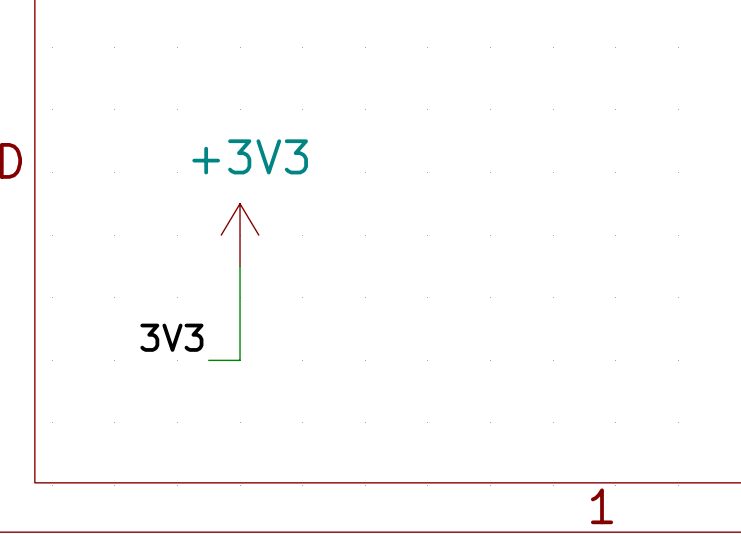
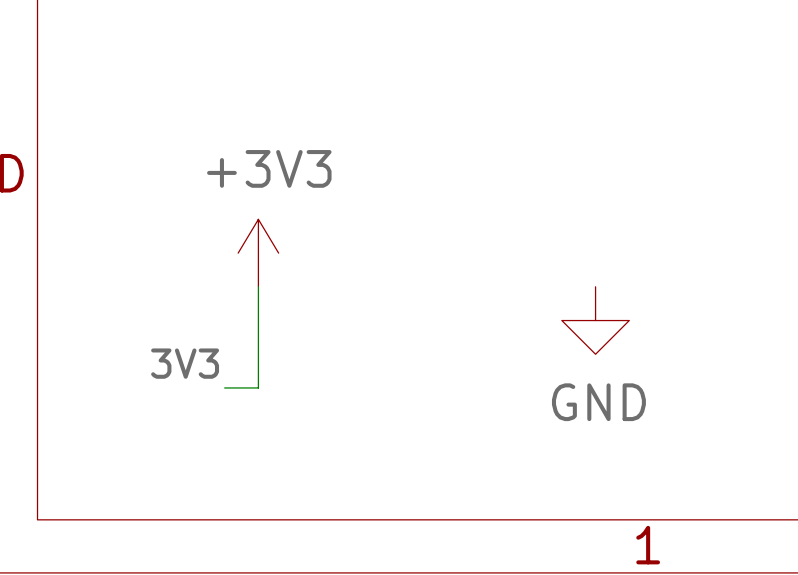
power symbol: none -> GND (595, 320)

